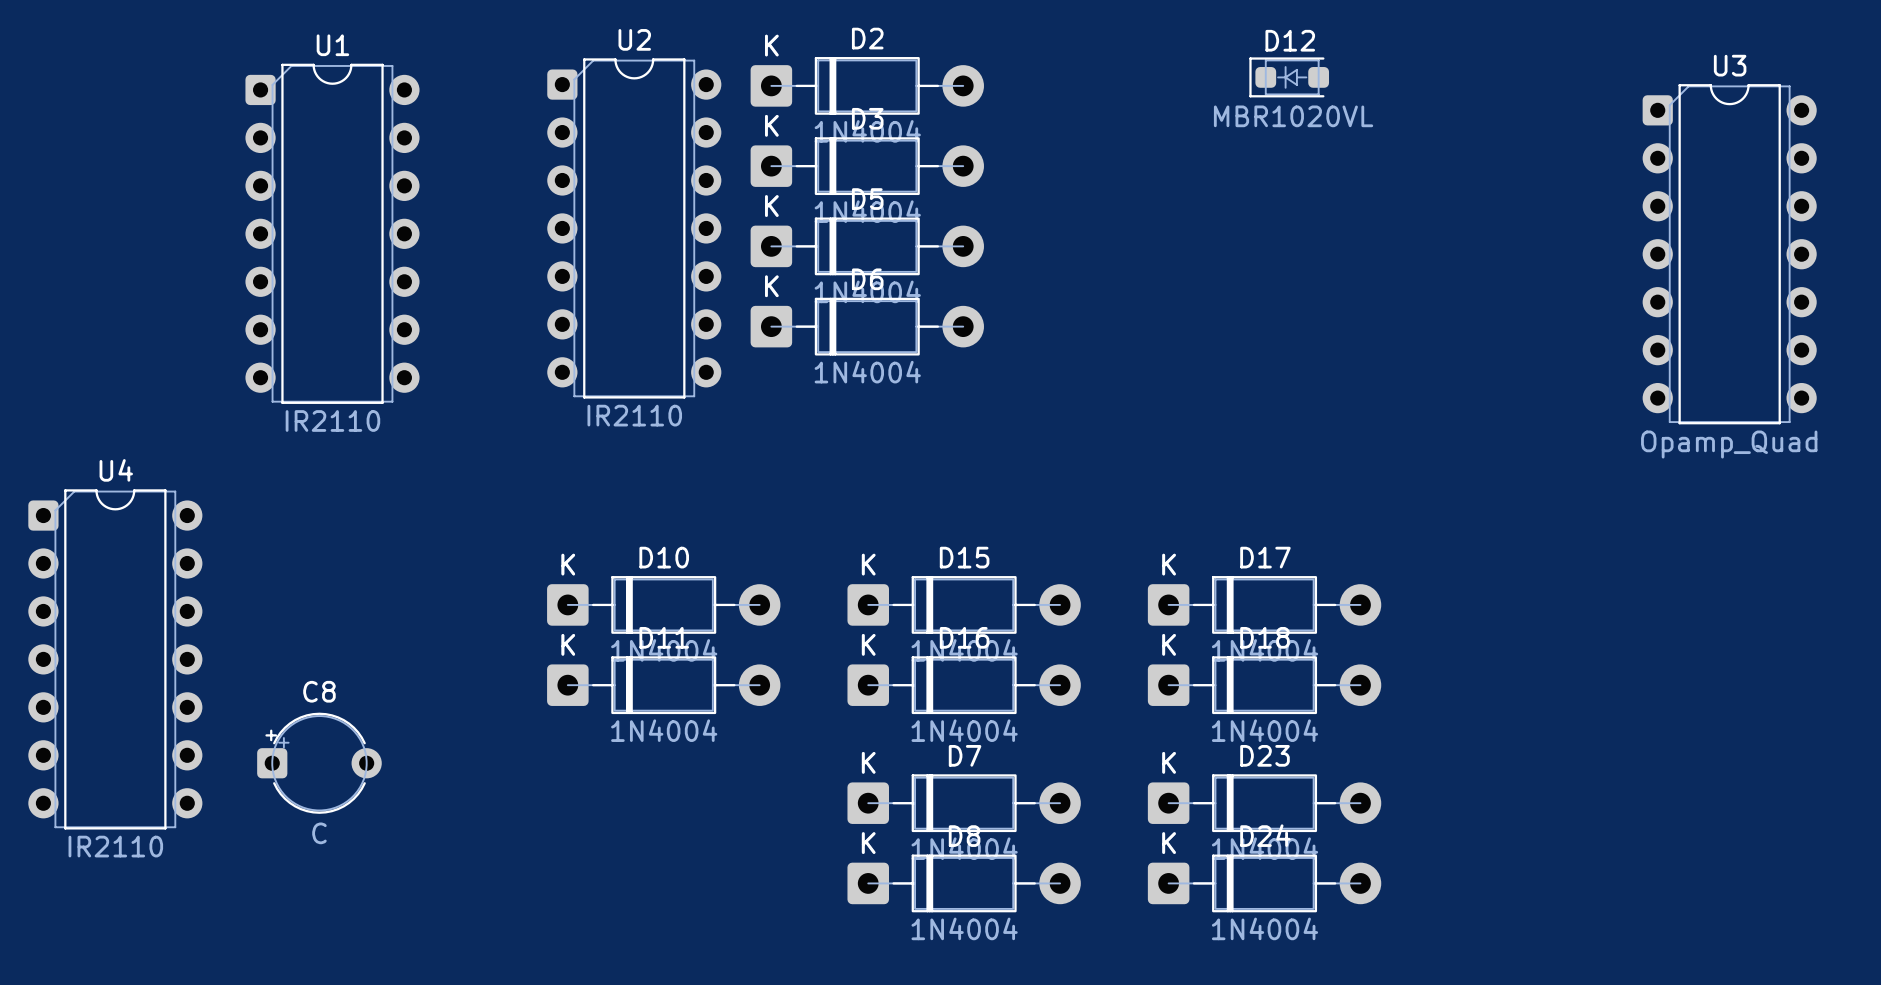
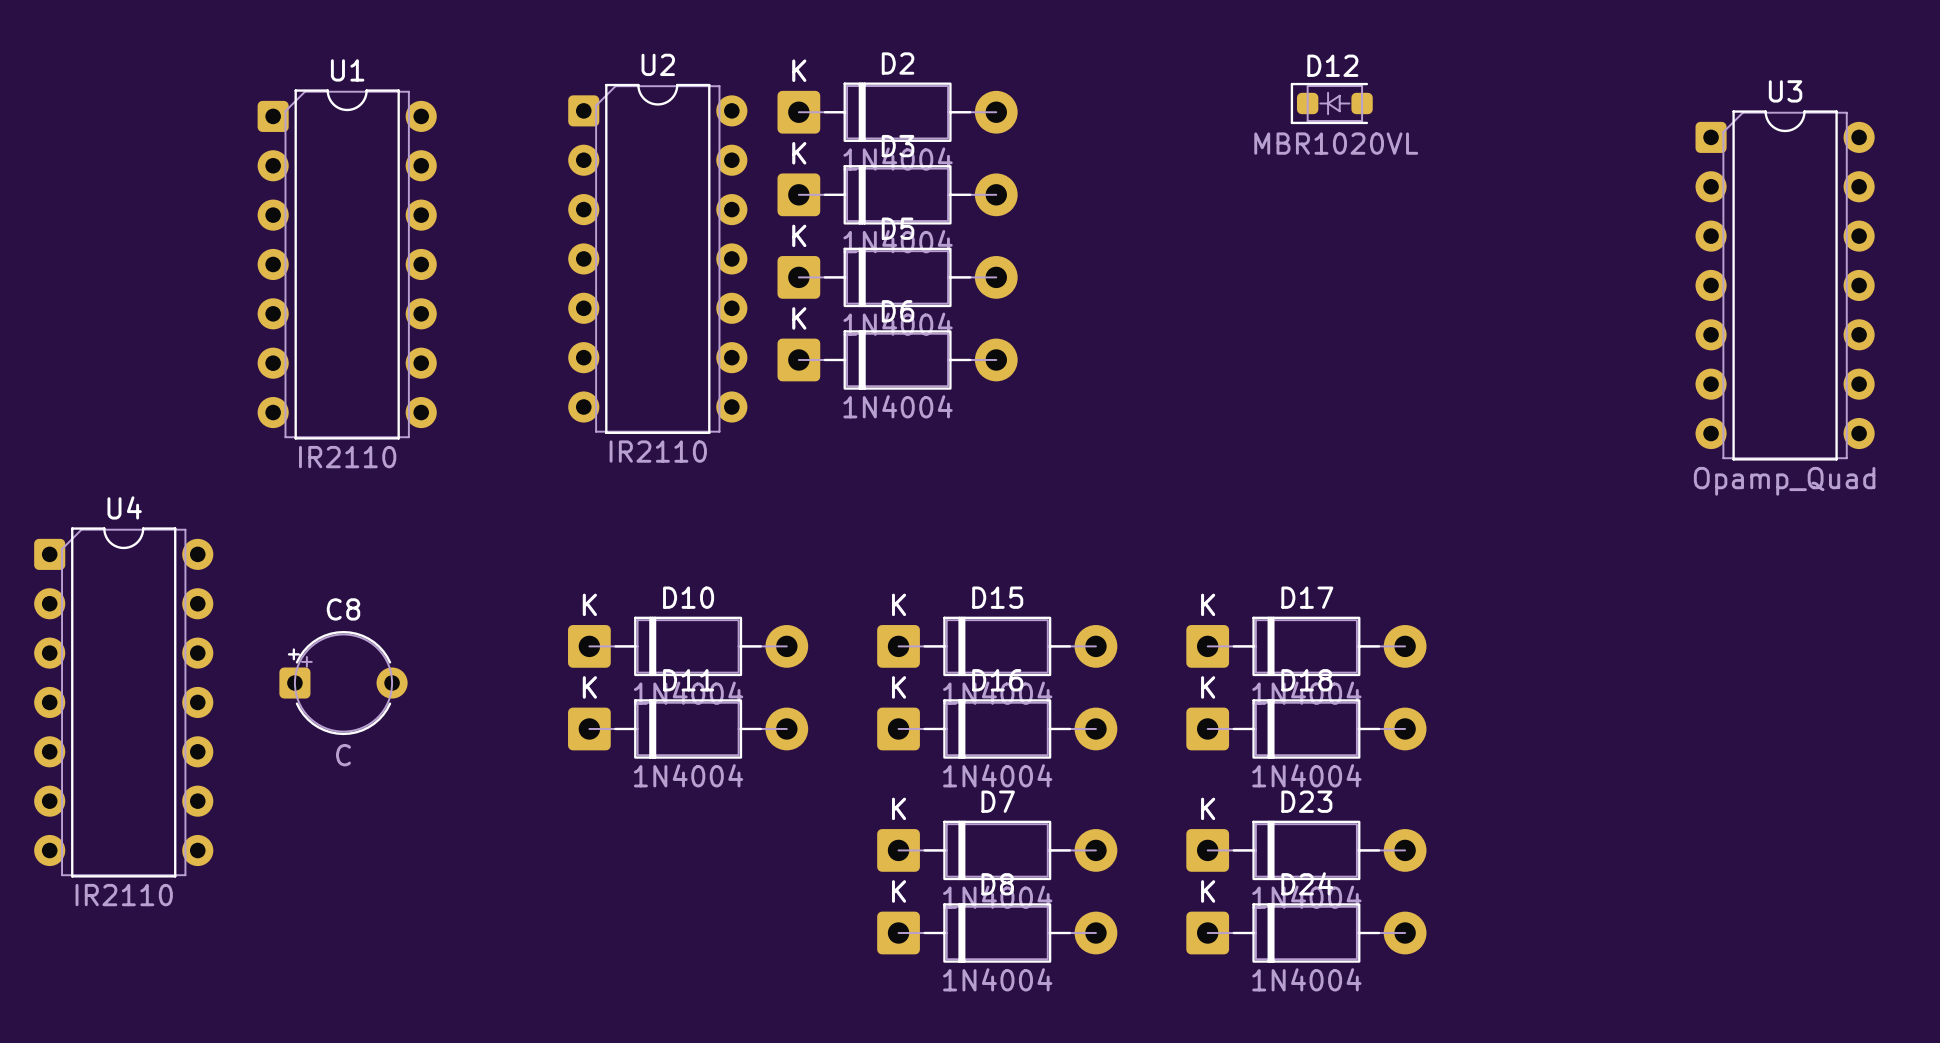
C8 position: (319, 763) -> (343, 683)

